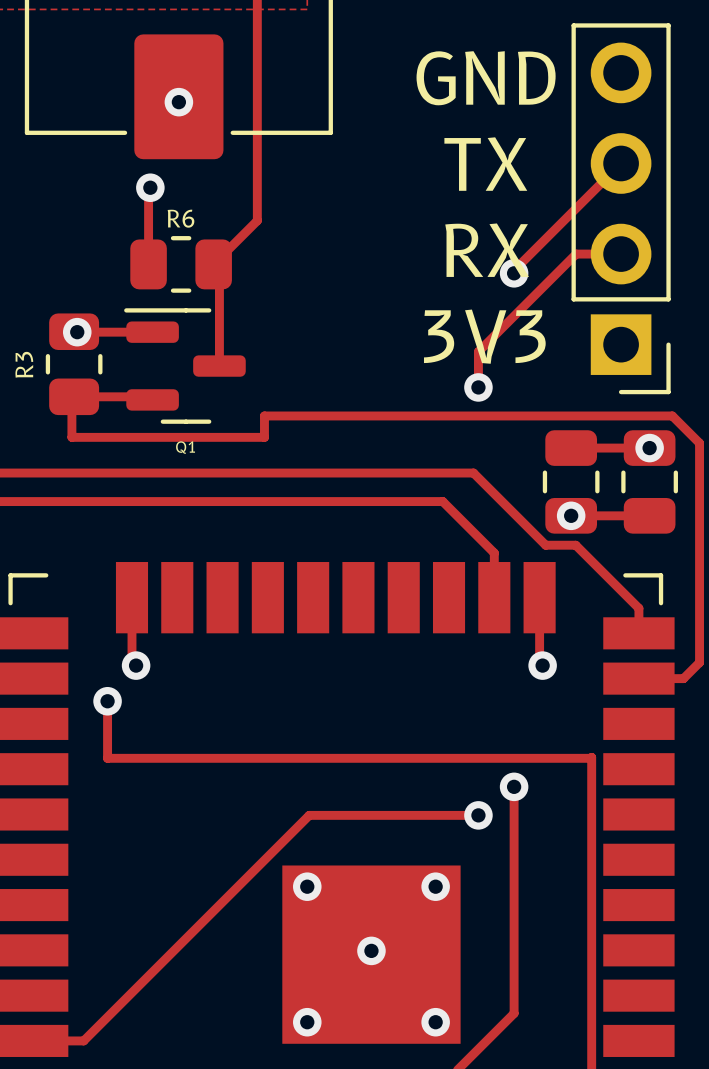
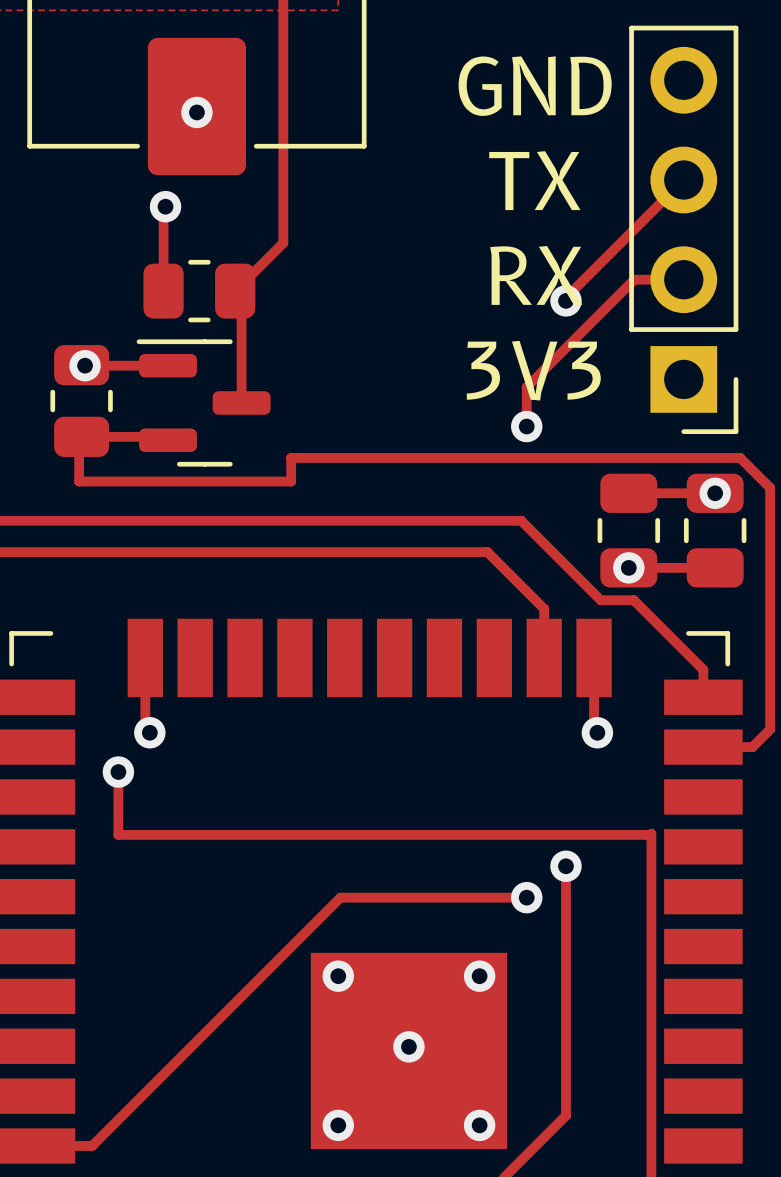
R6 name: R6 (181, 218) -> none
R3 name: R3 (24, 364) -> none
Q1 name: Q1 (185, 447) -> none

